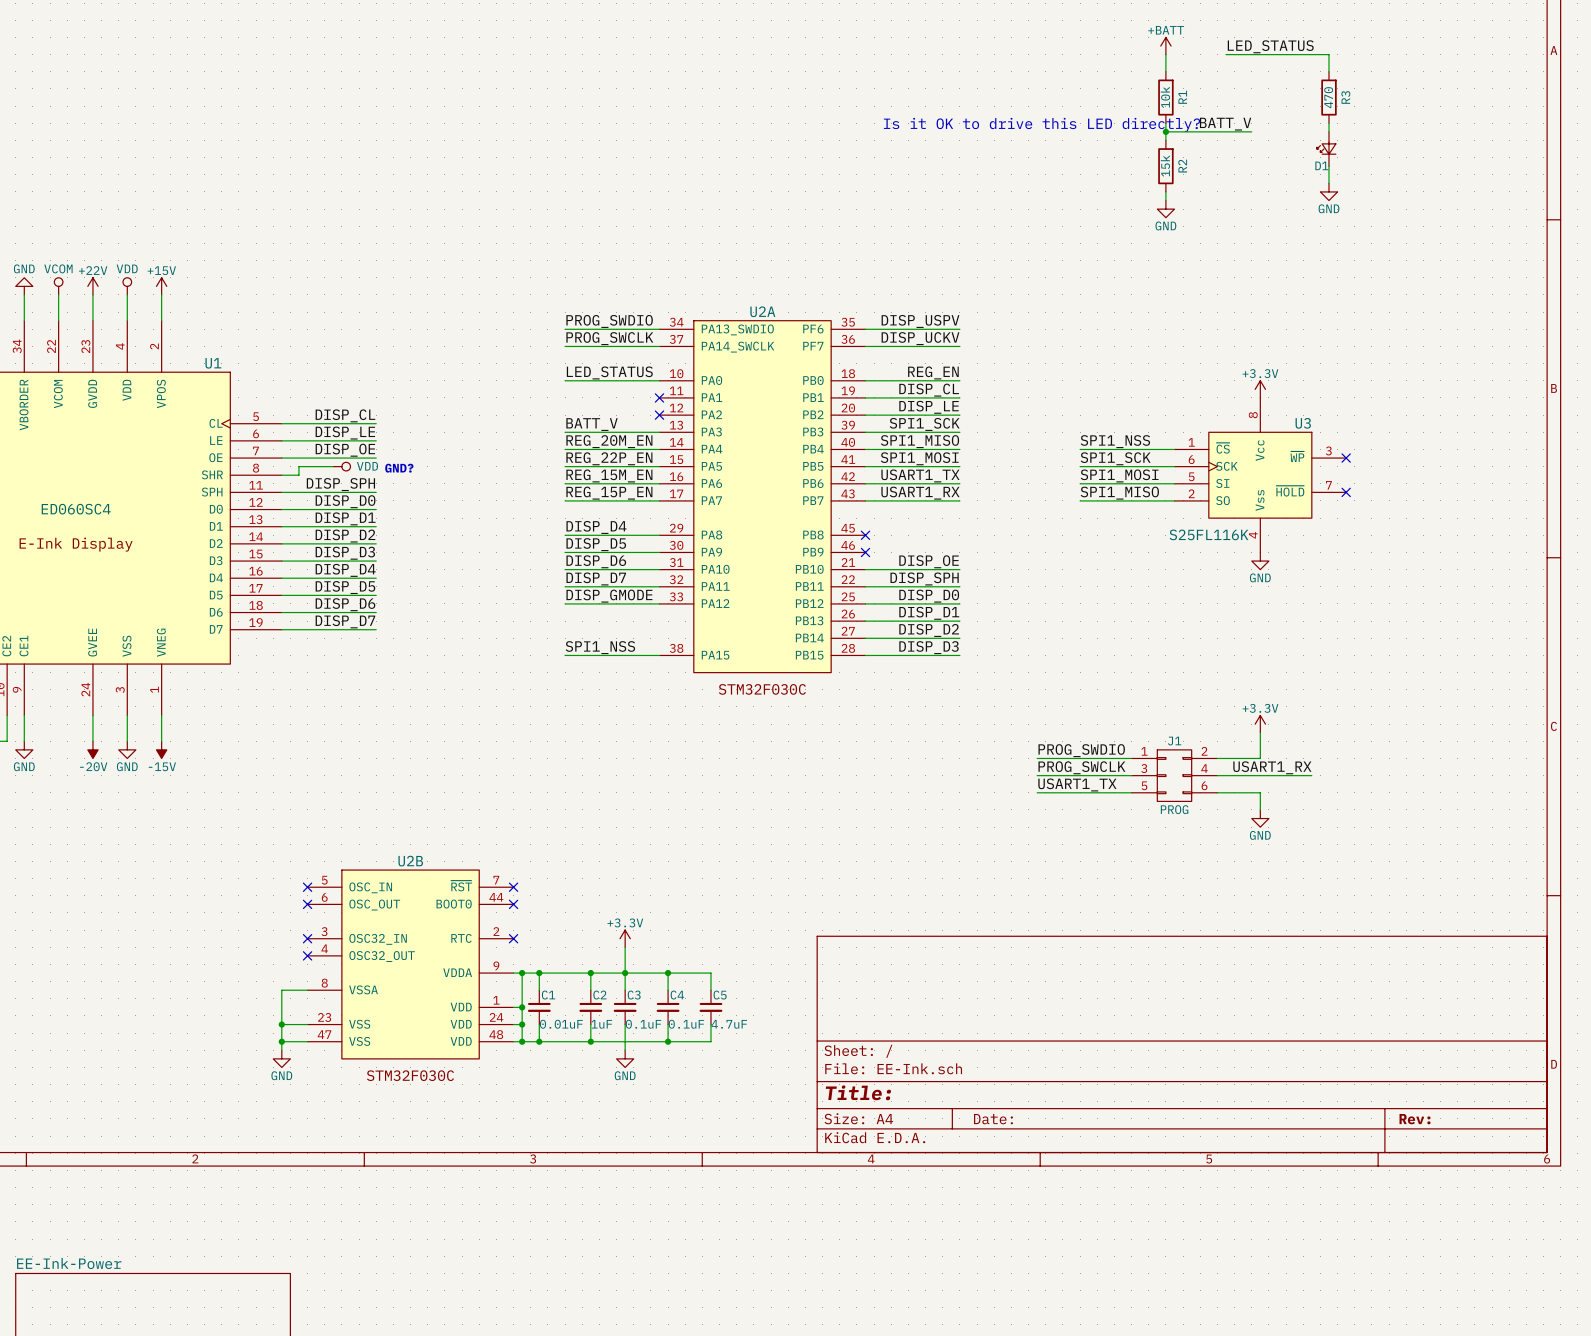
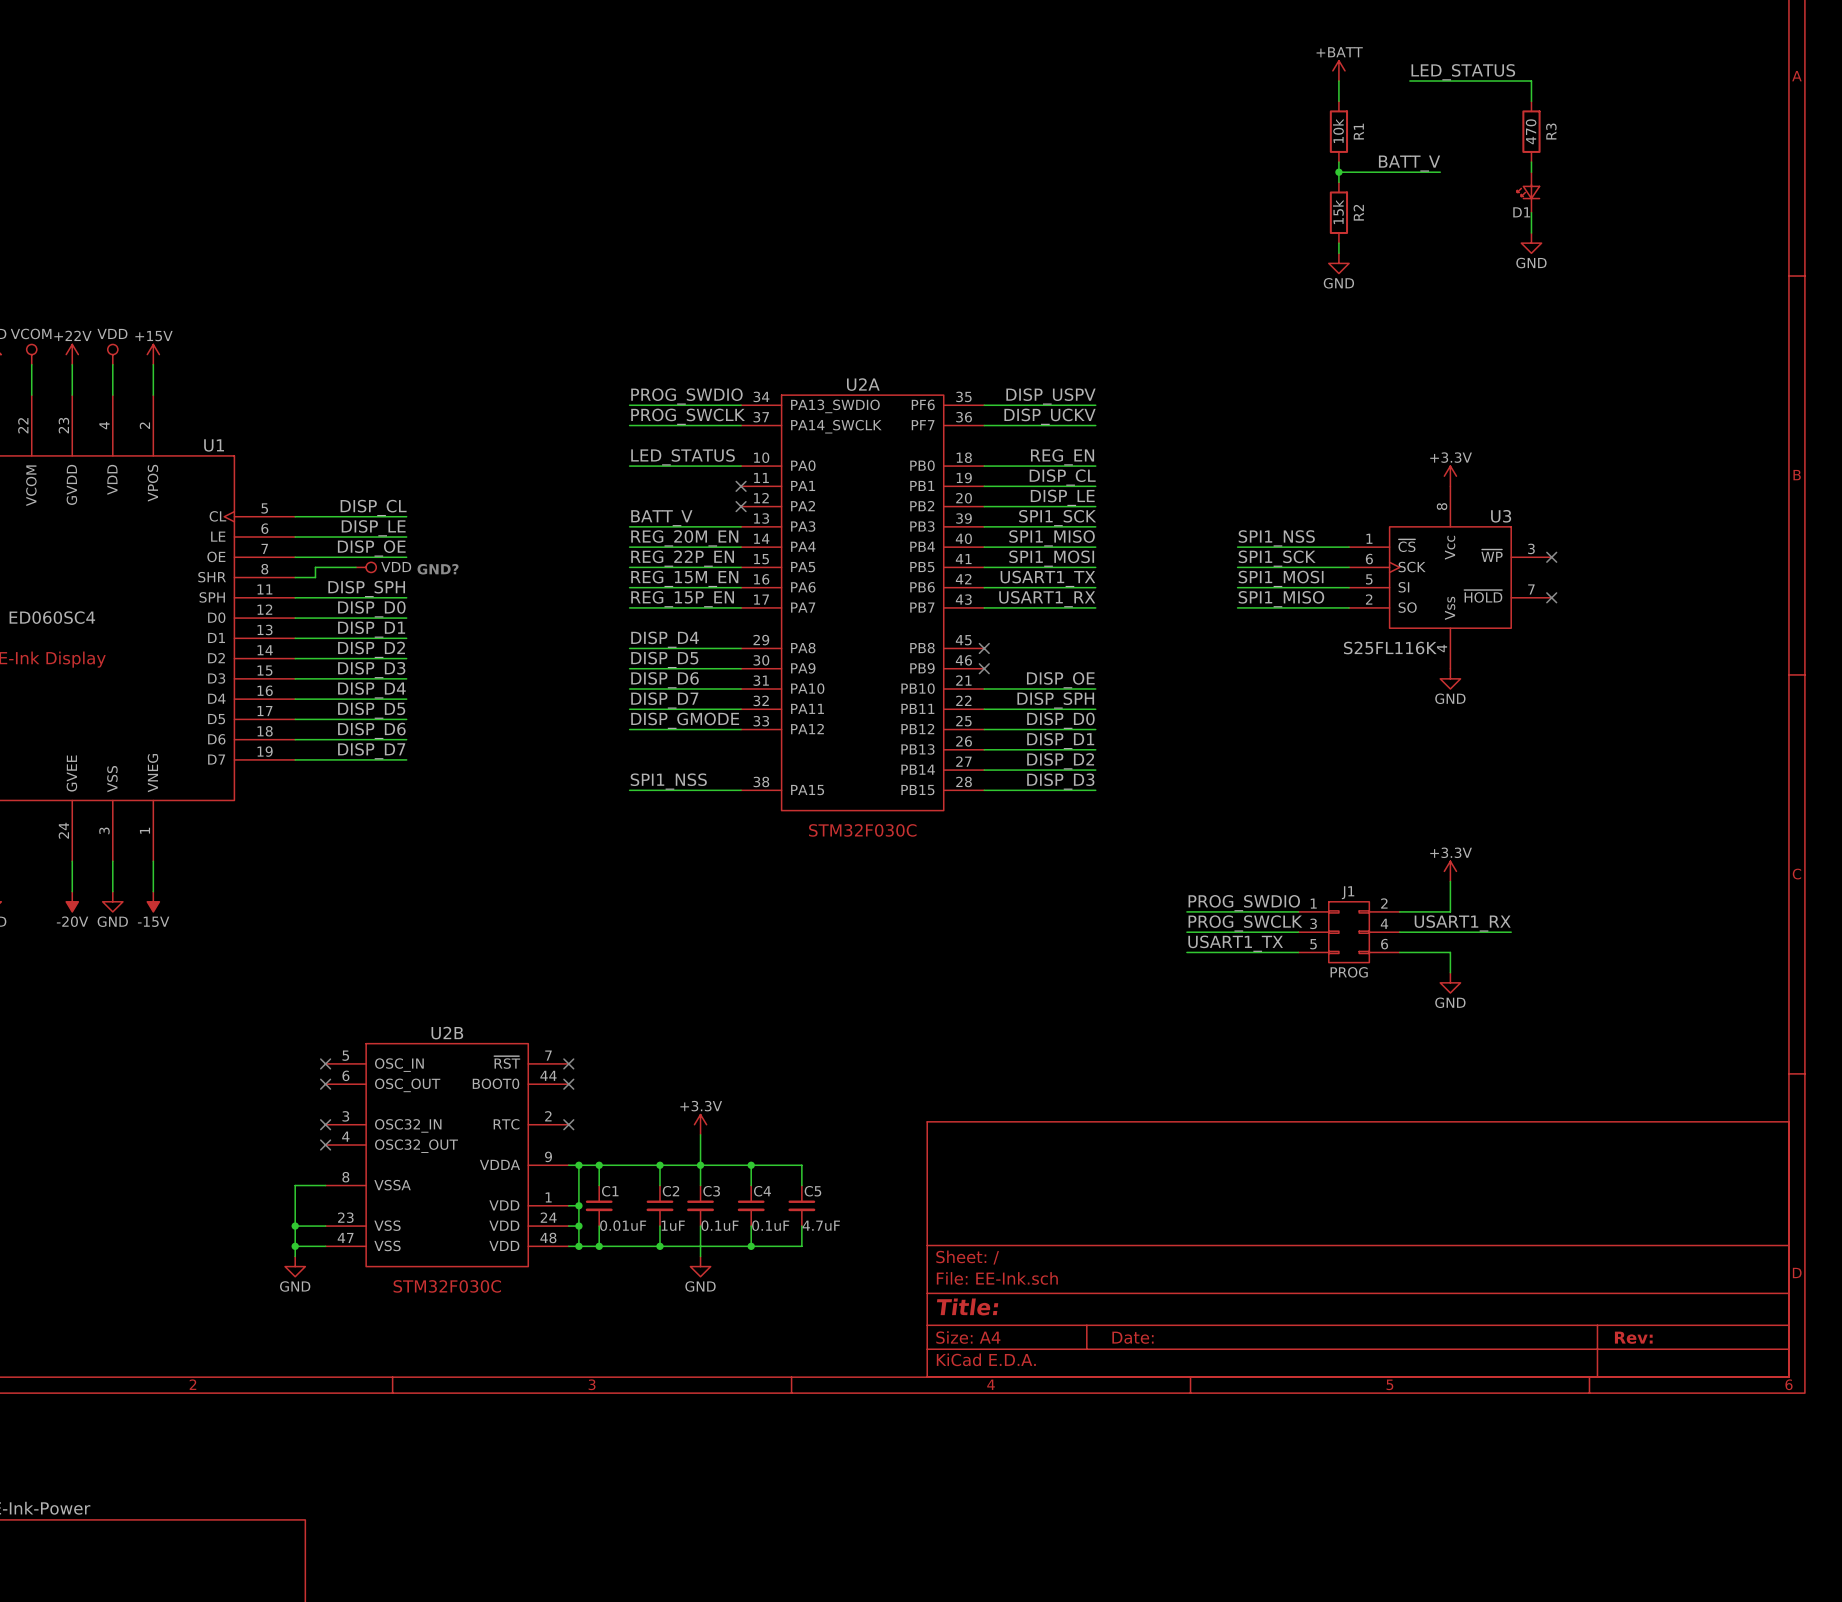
text: Is it OK to drive this LED directly? (1041, 124) -> none

